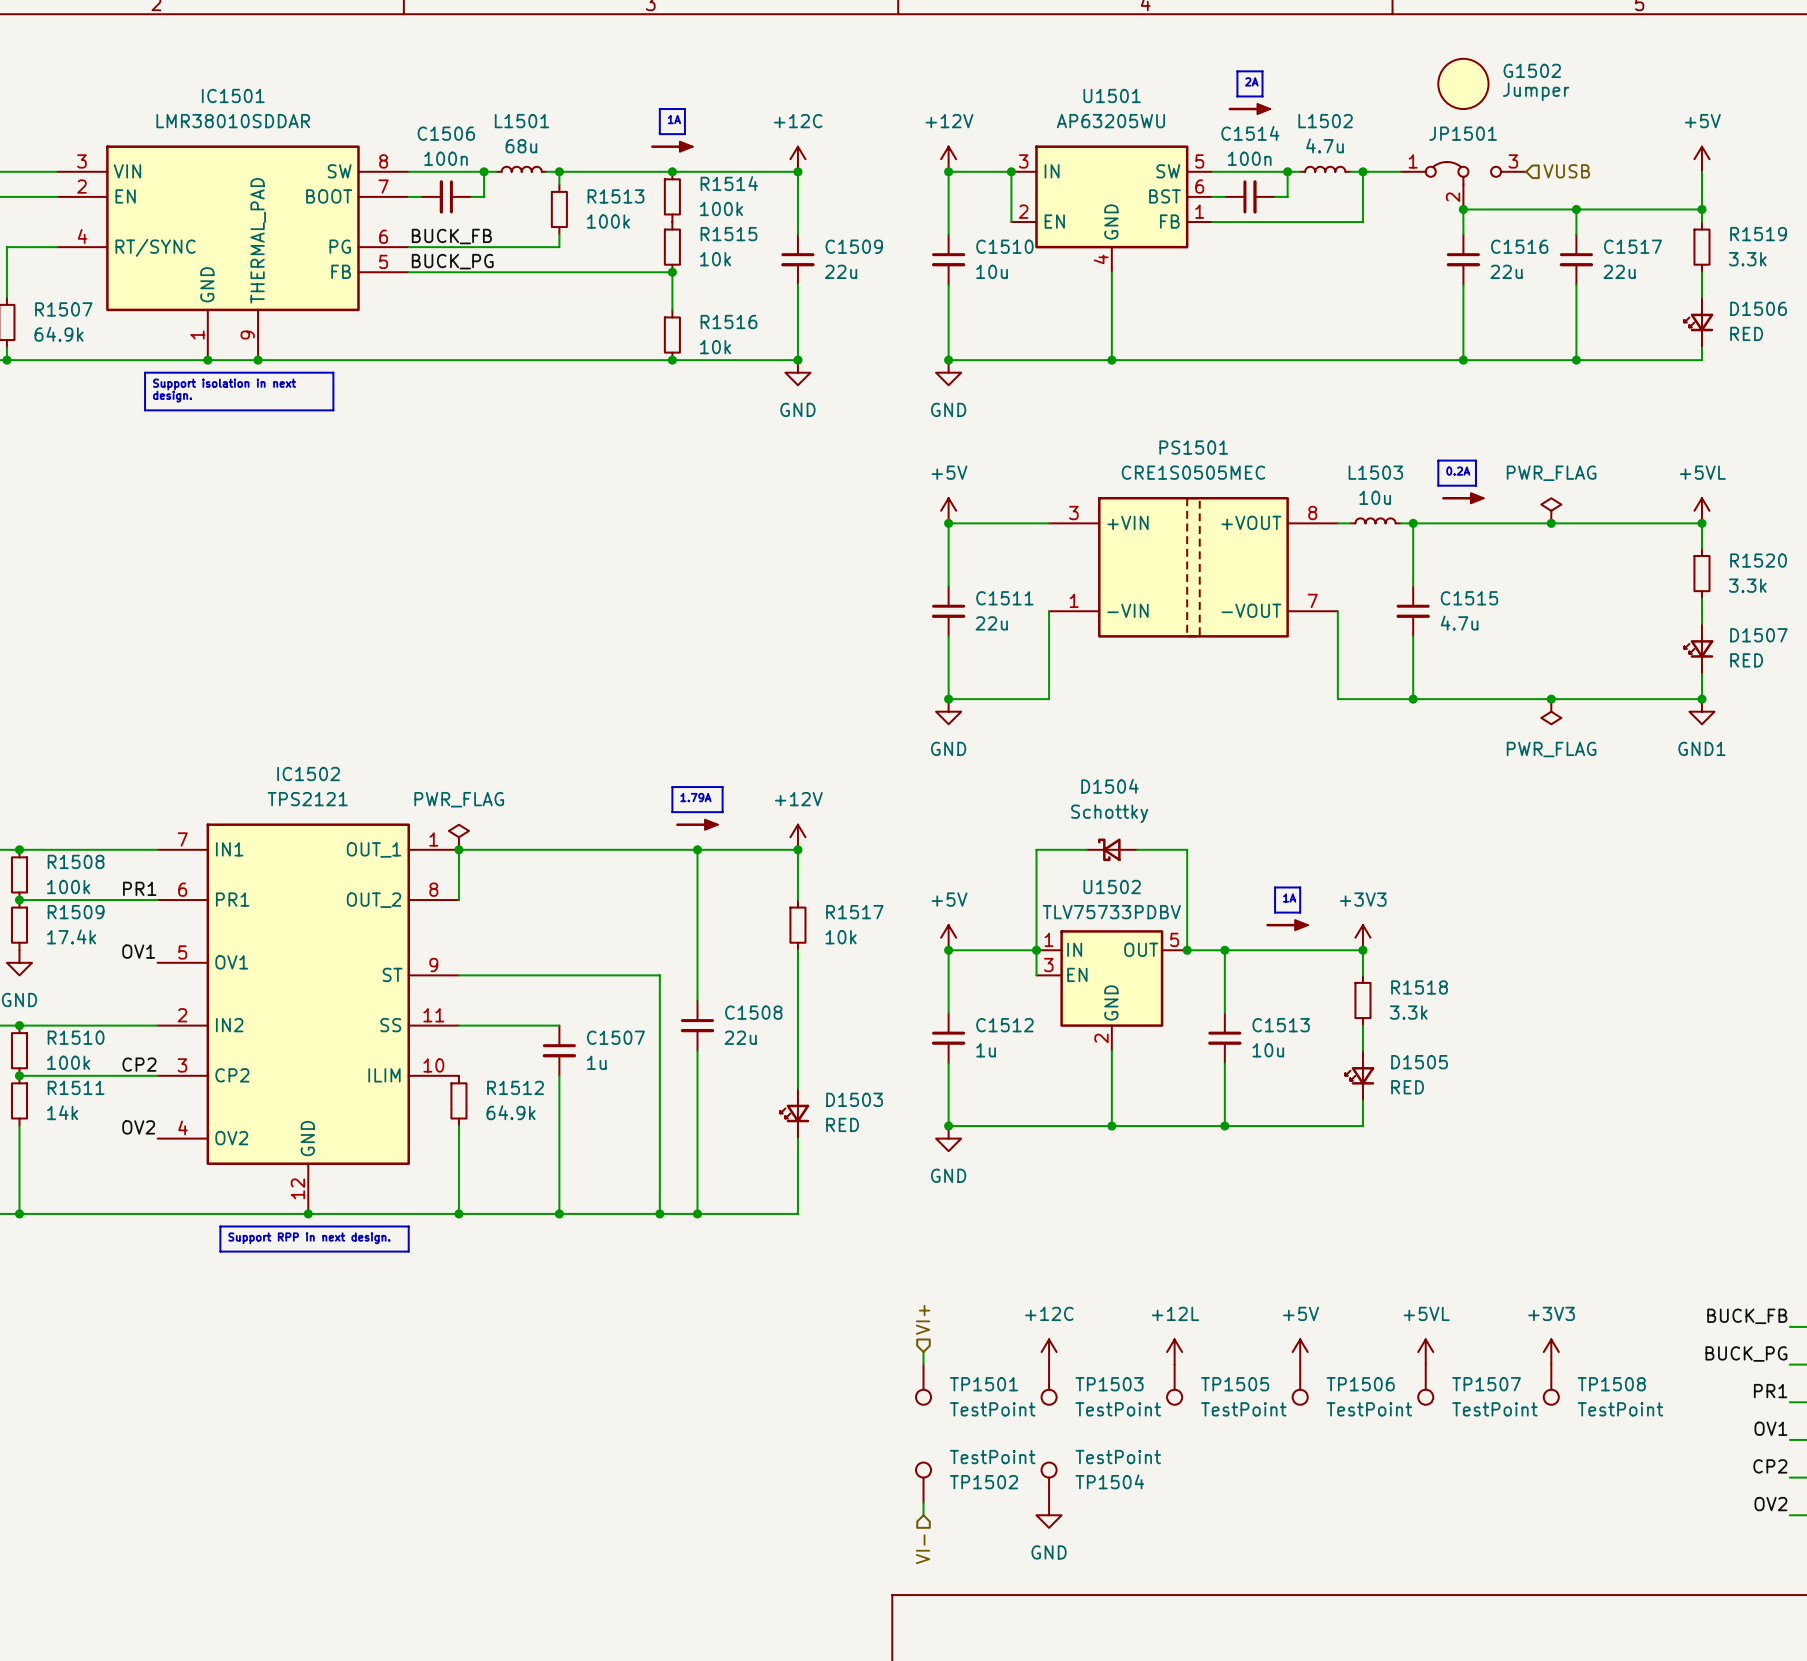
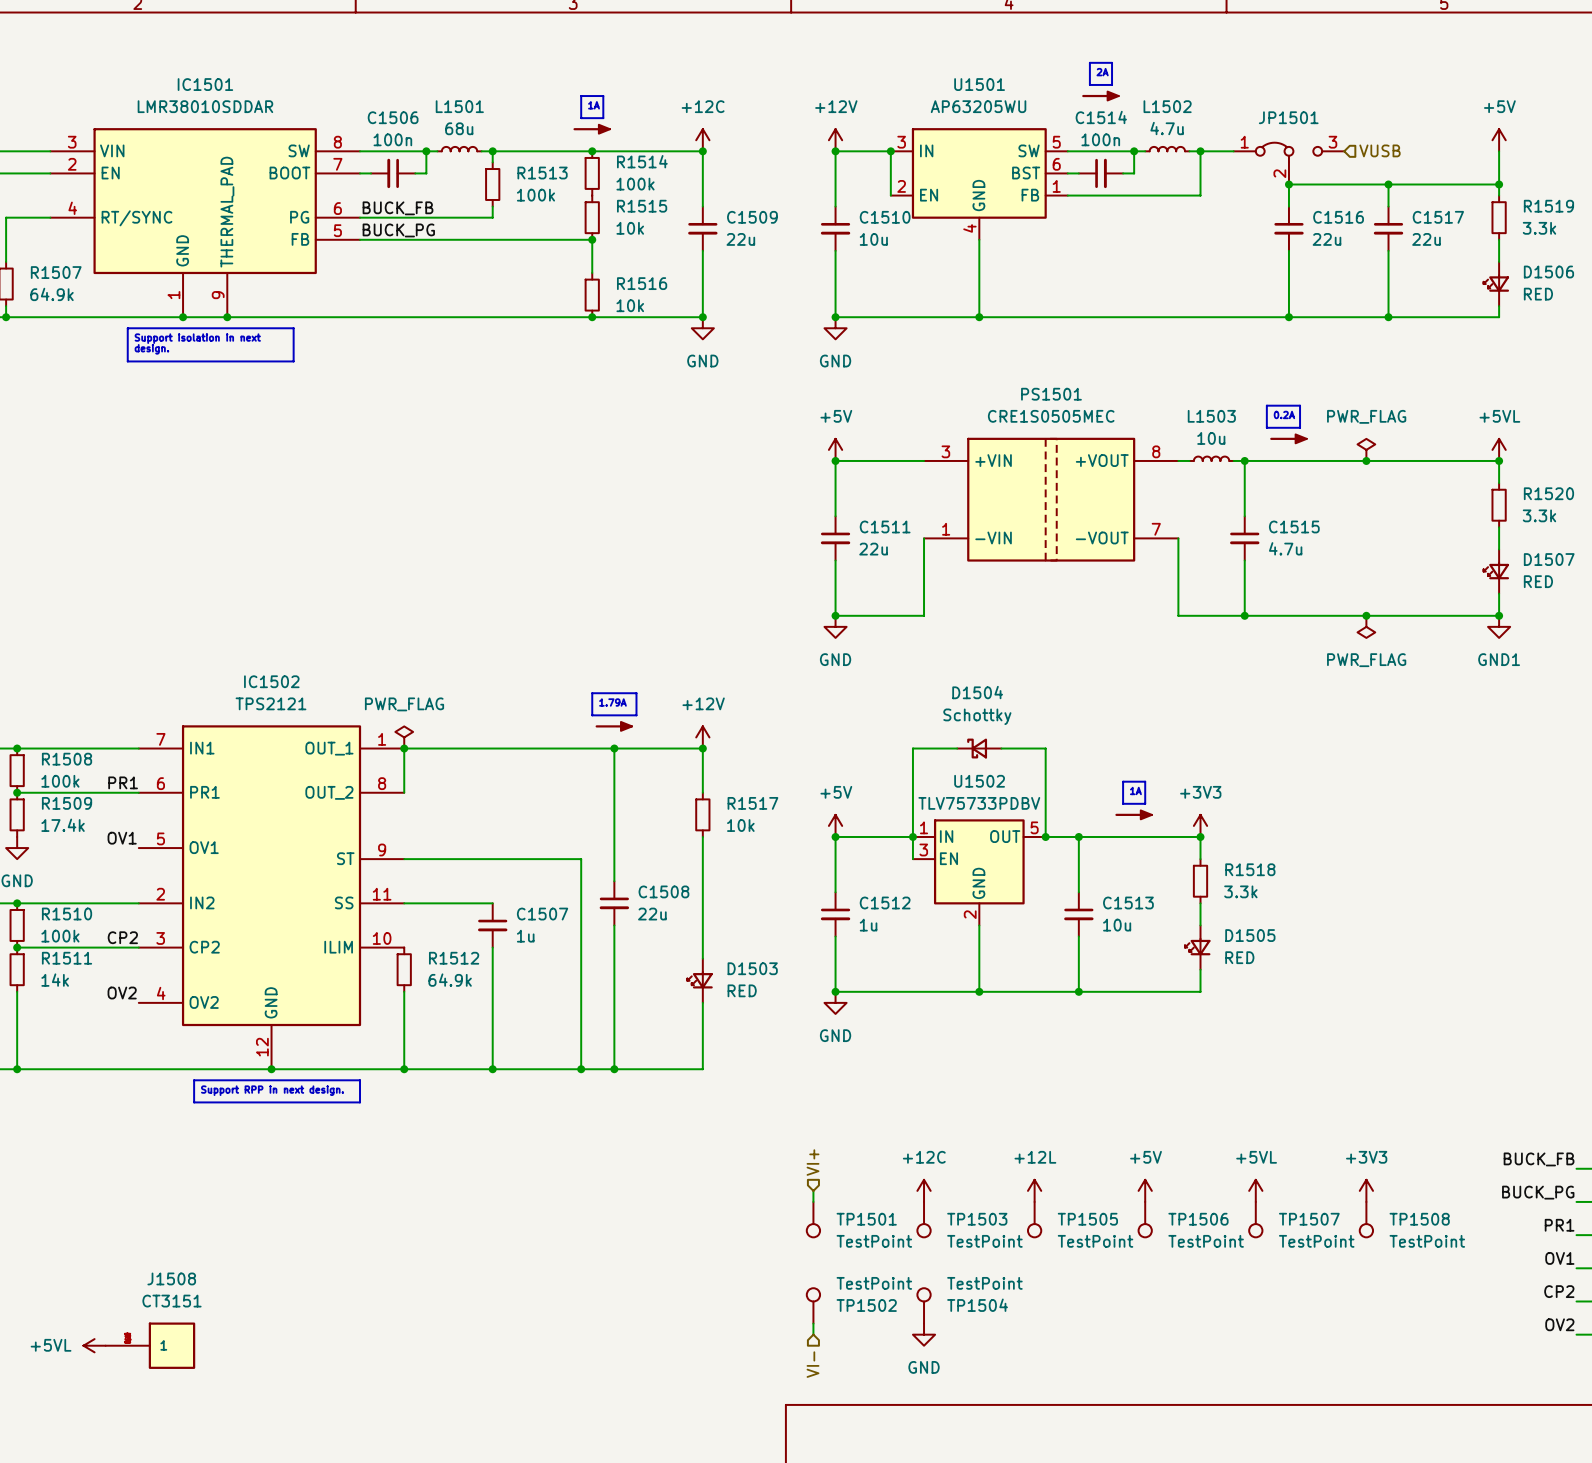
G1502: Jumper (1463, 83) -> none
power symbol: none -> +5VL (94, 1345)
J1508: none -> CT3151 (150, 1345)

